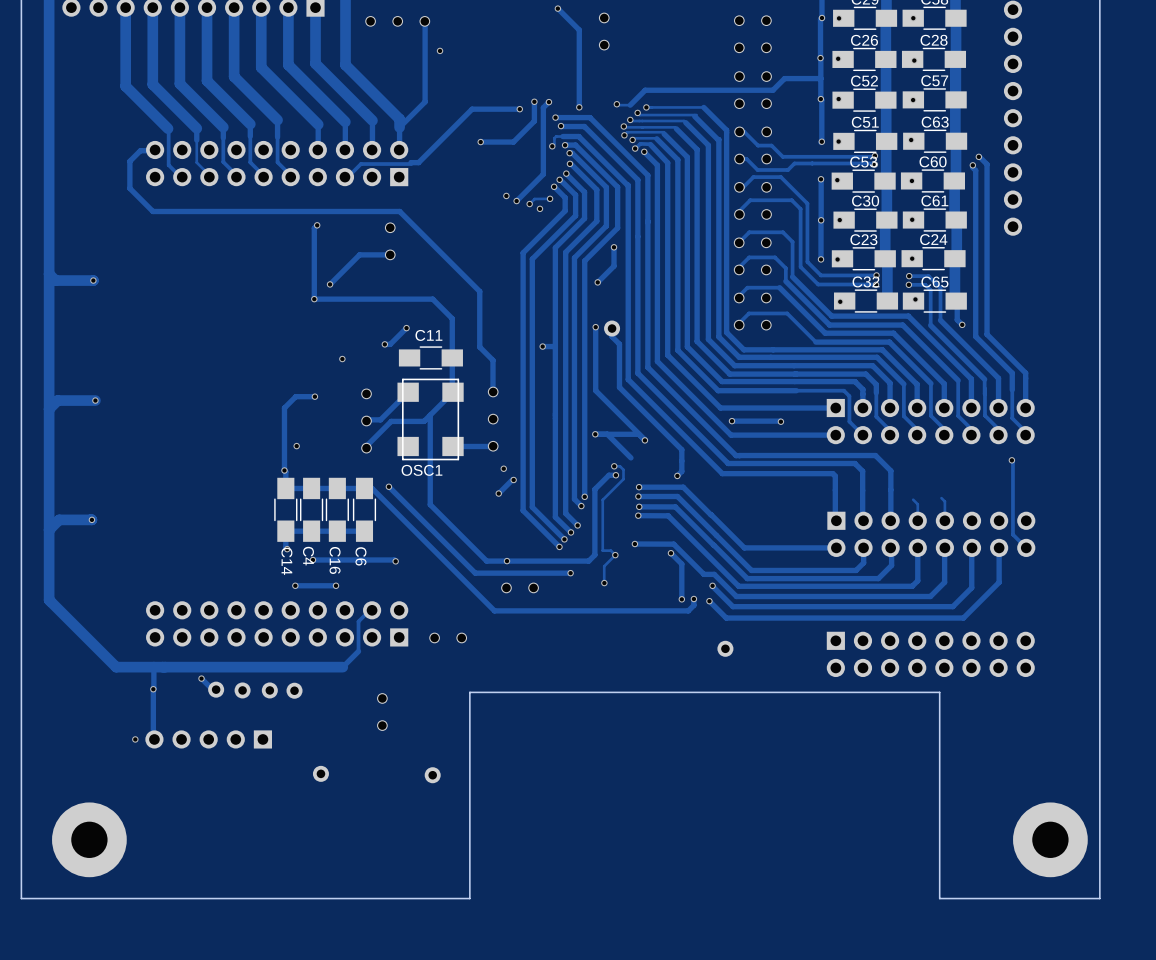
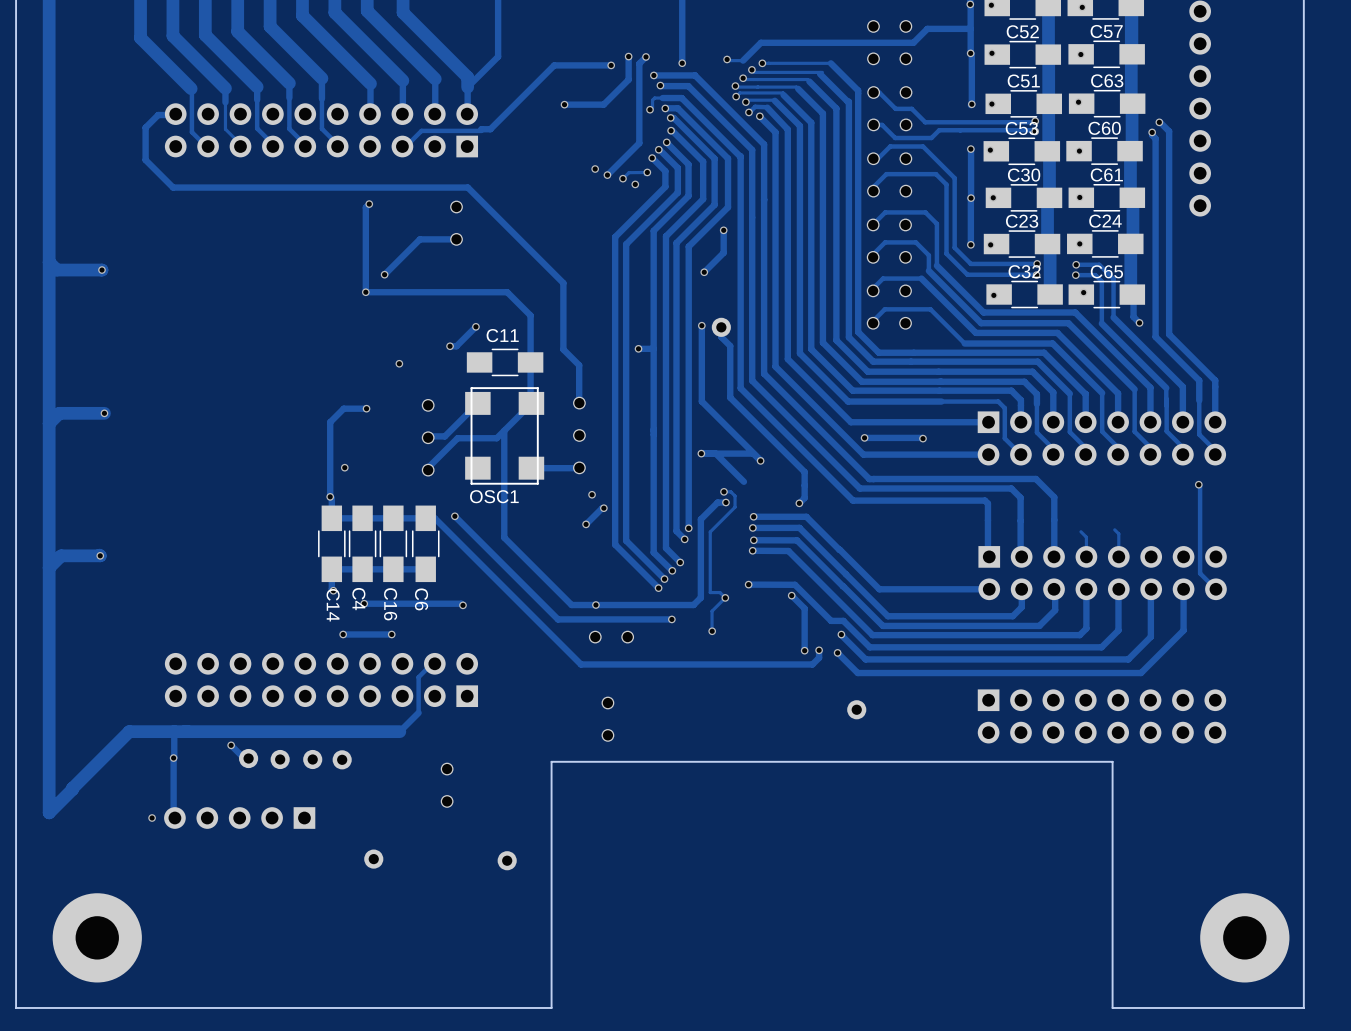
track: (49, 600) (116, 667) -> (49, 651) (49, 812) (72, 788)
part rotation: 0° (448, 637) -> 90° clockwise (607, 719)
part position: (448, 637) -> (607, 719)
track: none -> (129, 731) (72, 788)

